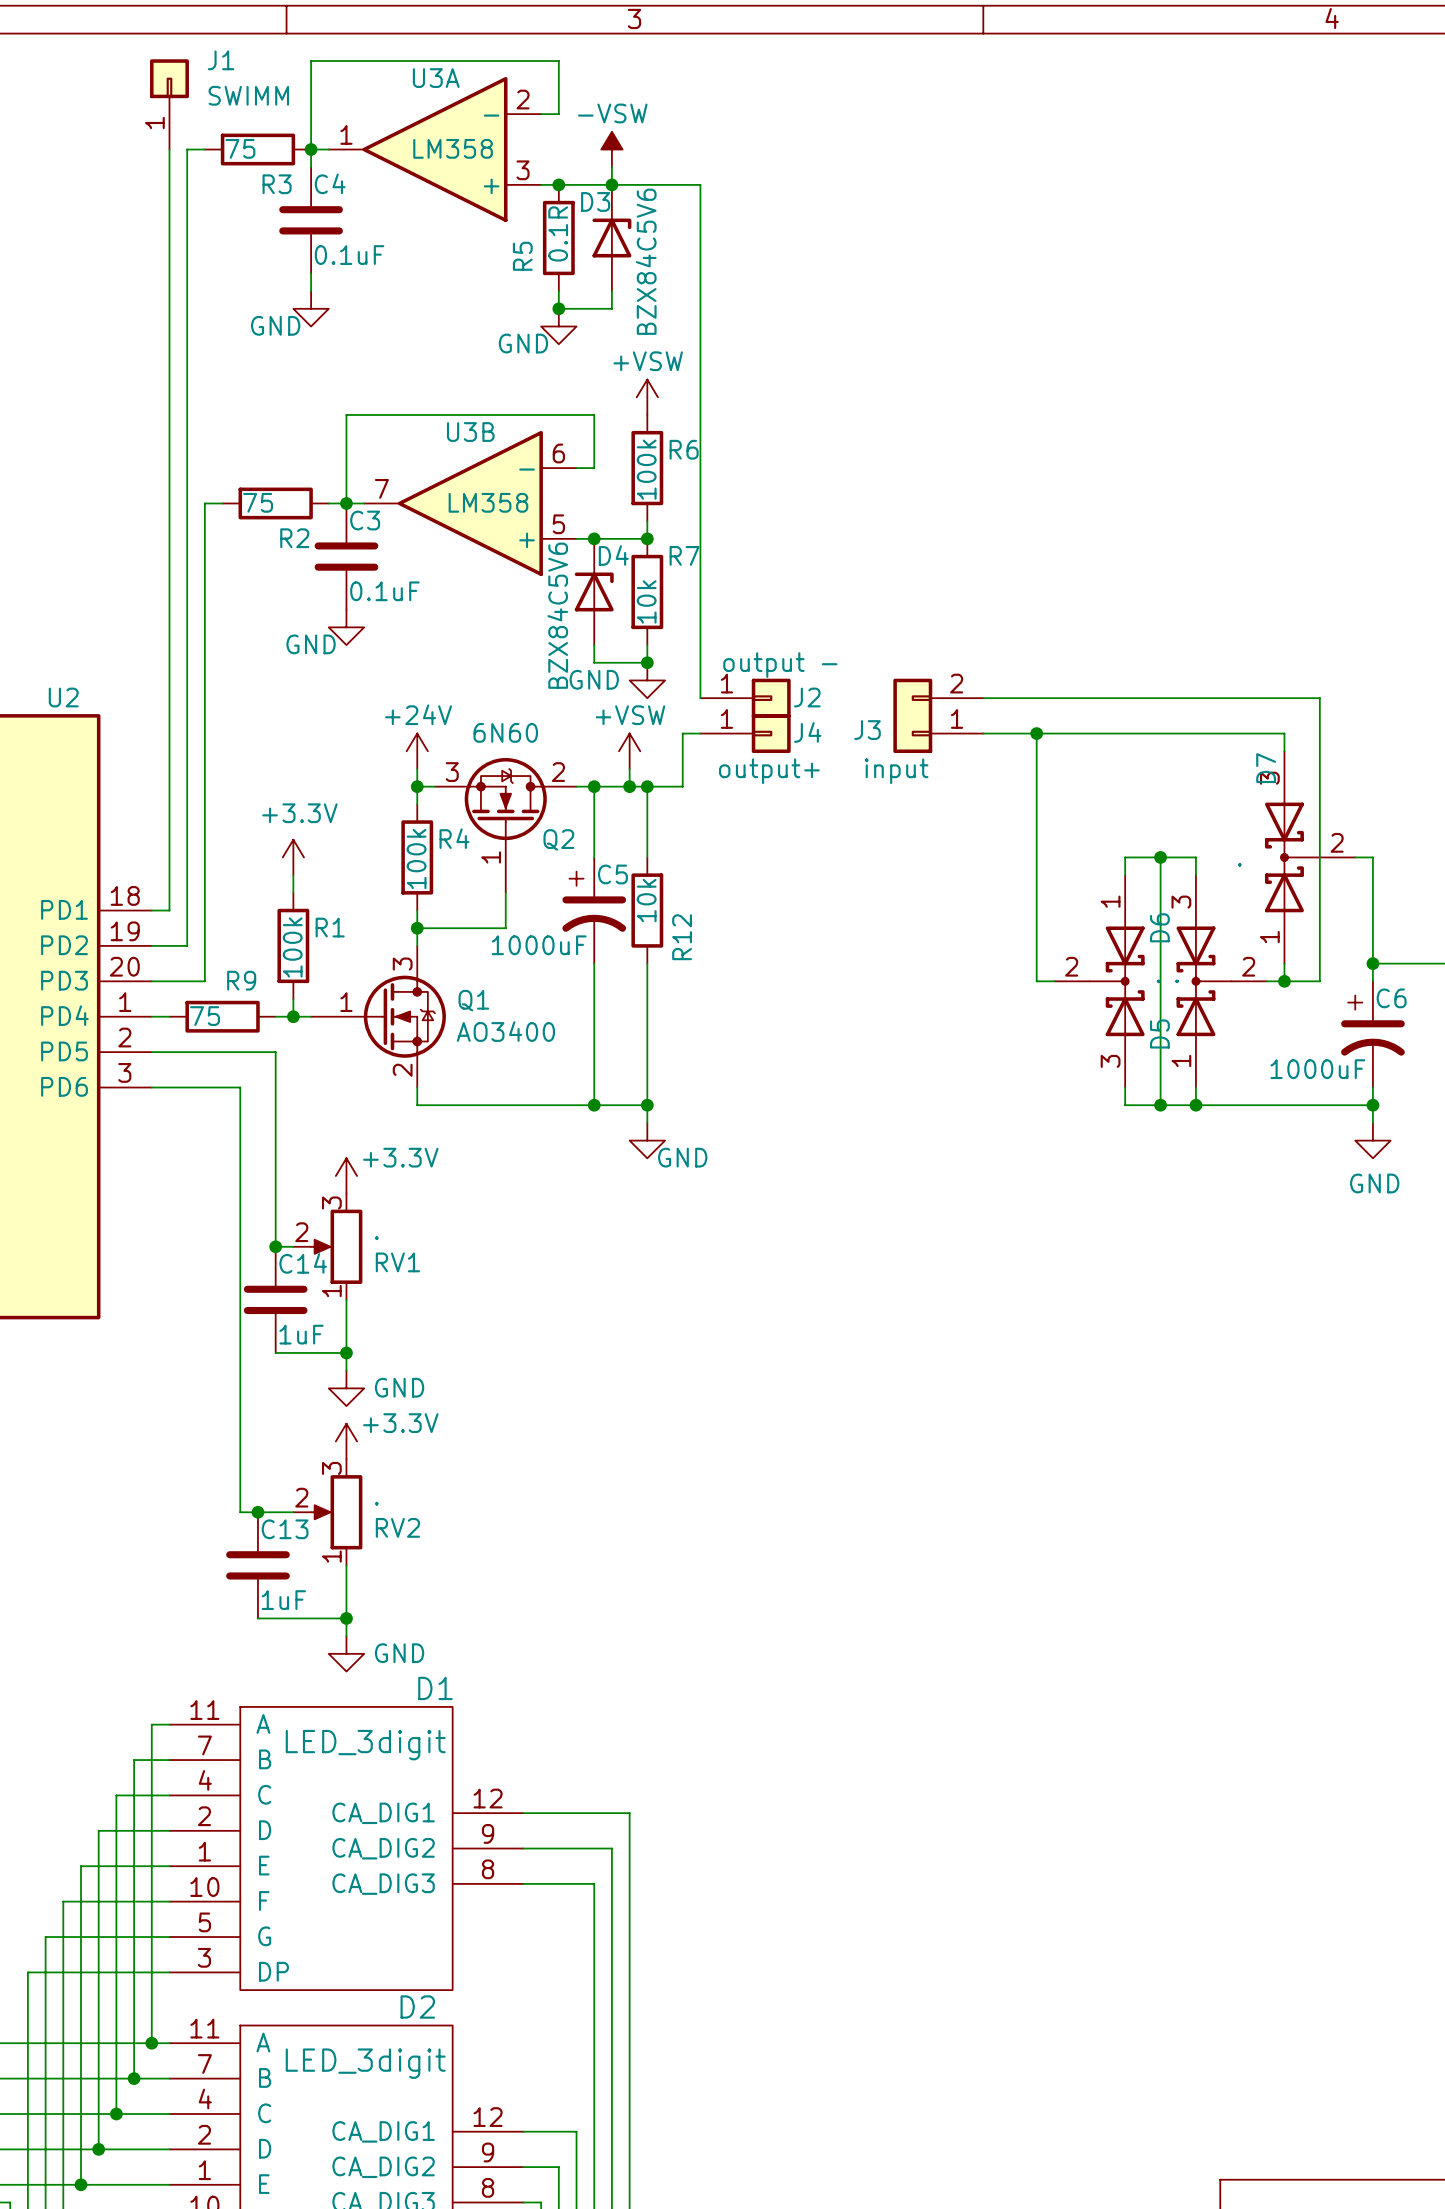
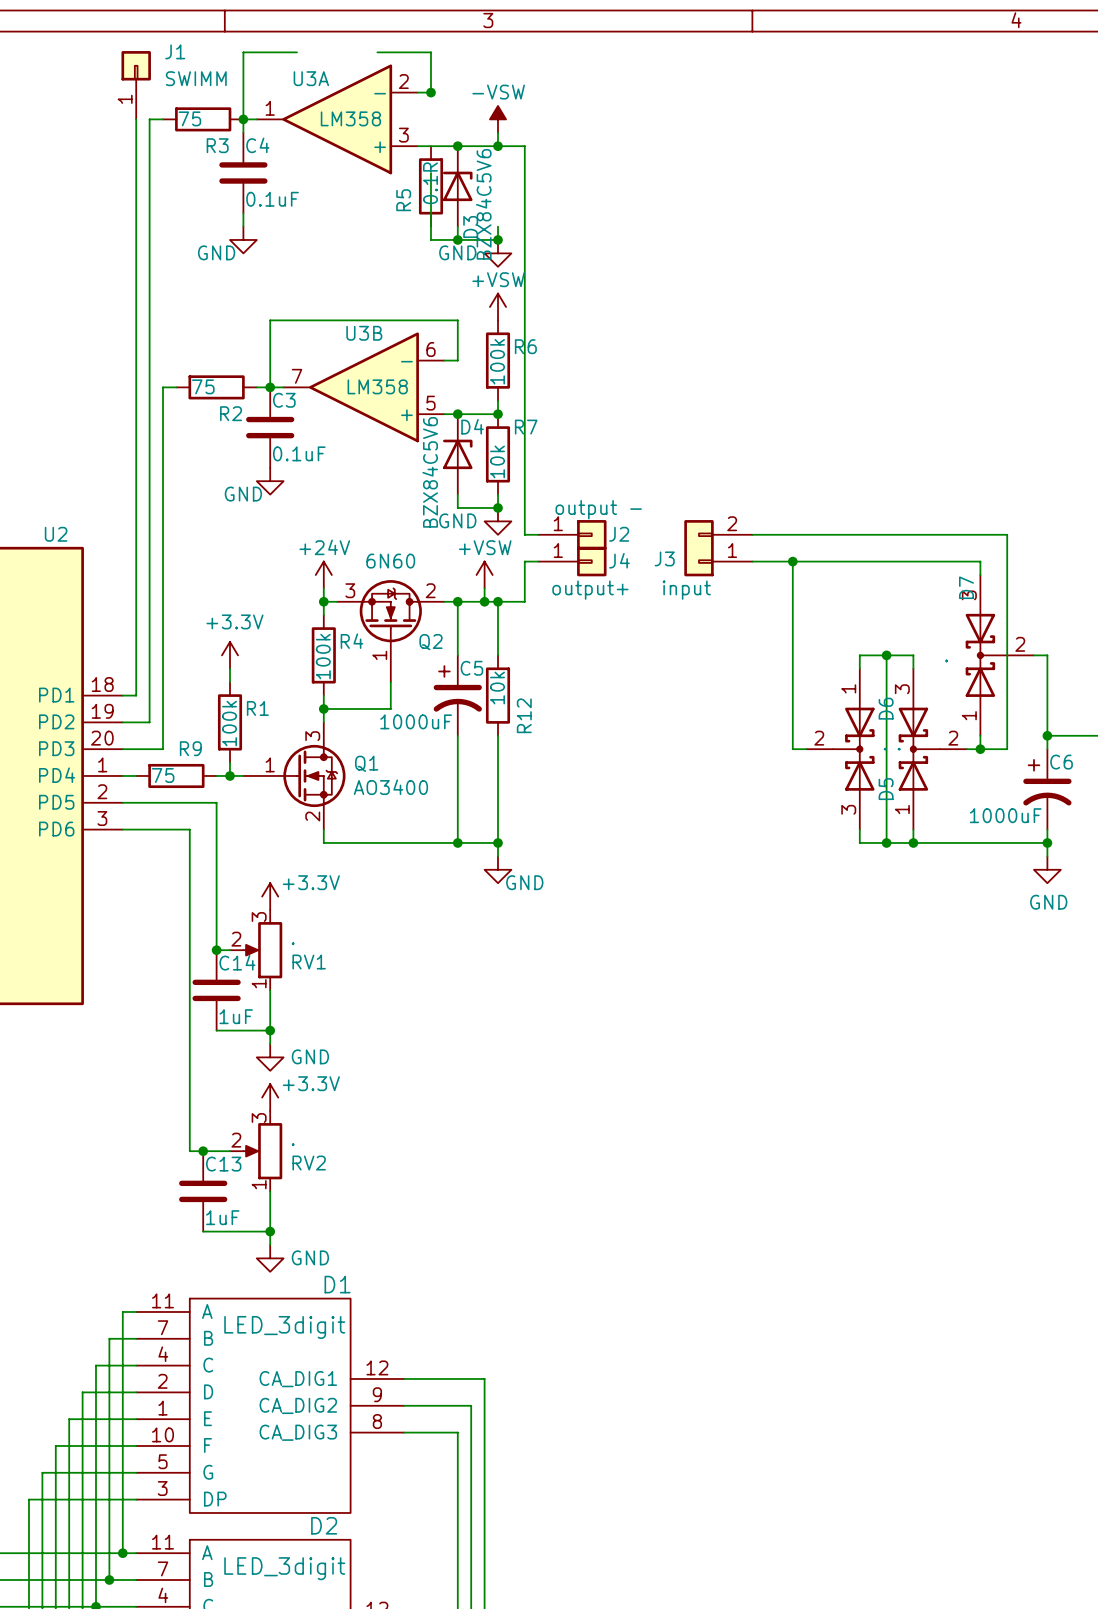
wire: (381, 61) (488, 61) -> none
U3A name position: U3A (436, 78) -> U3A (311, 78)
junction: none -> (431, 92)
power symbol position: -VSW (611, 149) -> -VSW (498, 119)
wire: (611, 167) (611, 184) -> (498, 132) (498, 146)
junction: (558, 184) -> none
junction: none -> (457, 146)
junction: (611, 184) -> none
junction: none -> (498, 146)
wire: (682, 184) (700, 184) (700, 698) -> (524, 146) (524, 534) (538, 534)
D3 name rotation: 0° (595, 201) -> 90° counterclockwise (470, 227)
D3 name position: D3 (595, 201) -> D3 (470, 227)
wire: none -> (431, 172) (431, 226)
D3 position: (611, 238) -> (457, 186)
wire: none -> (457, 226) (457, 239)
wire: (611, 291) (611, 308) -> (498, 226) (498, 239) (471, 239)
junction position: (558, 308) -> (457, 239)
junction: none -> (498, 239)
power symbol position: GND (558, 326) -> GND (498, 253)
power symbol text position: GND (523, 343) -> GND (457, 252)

